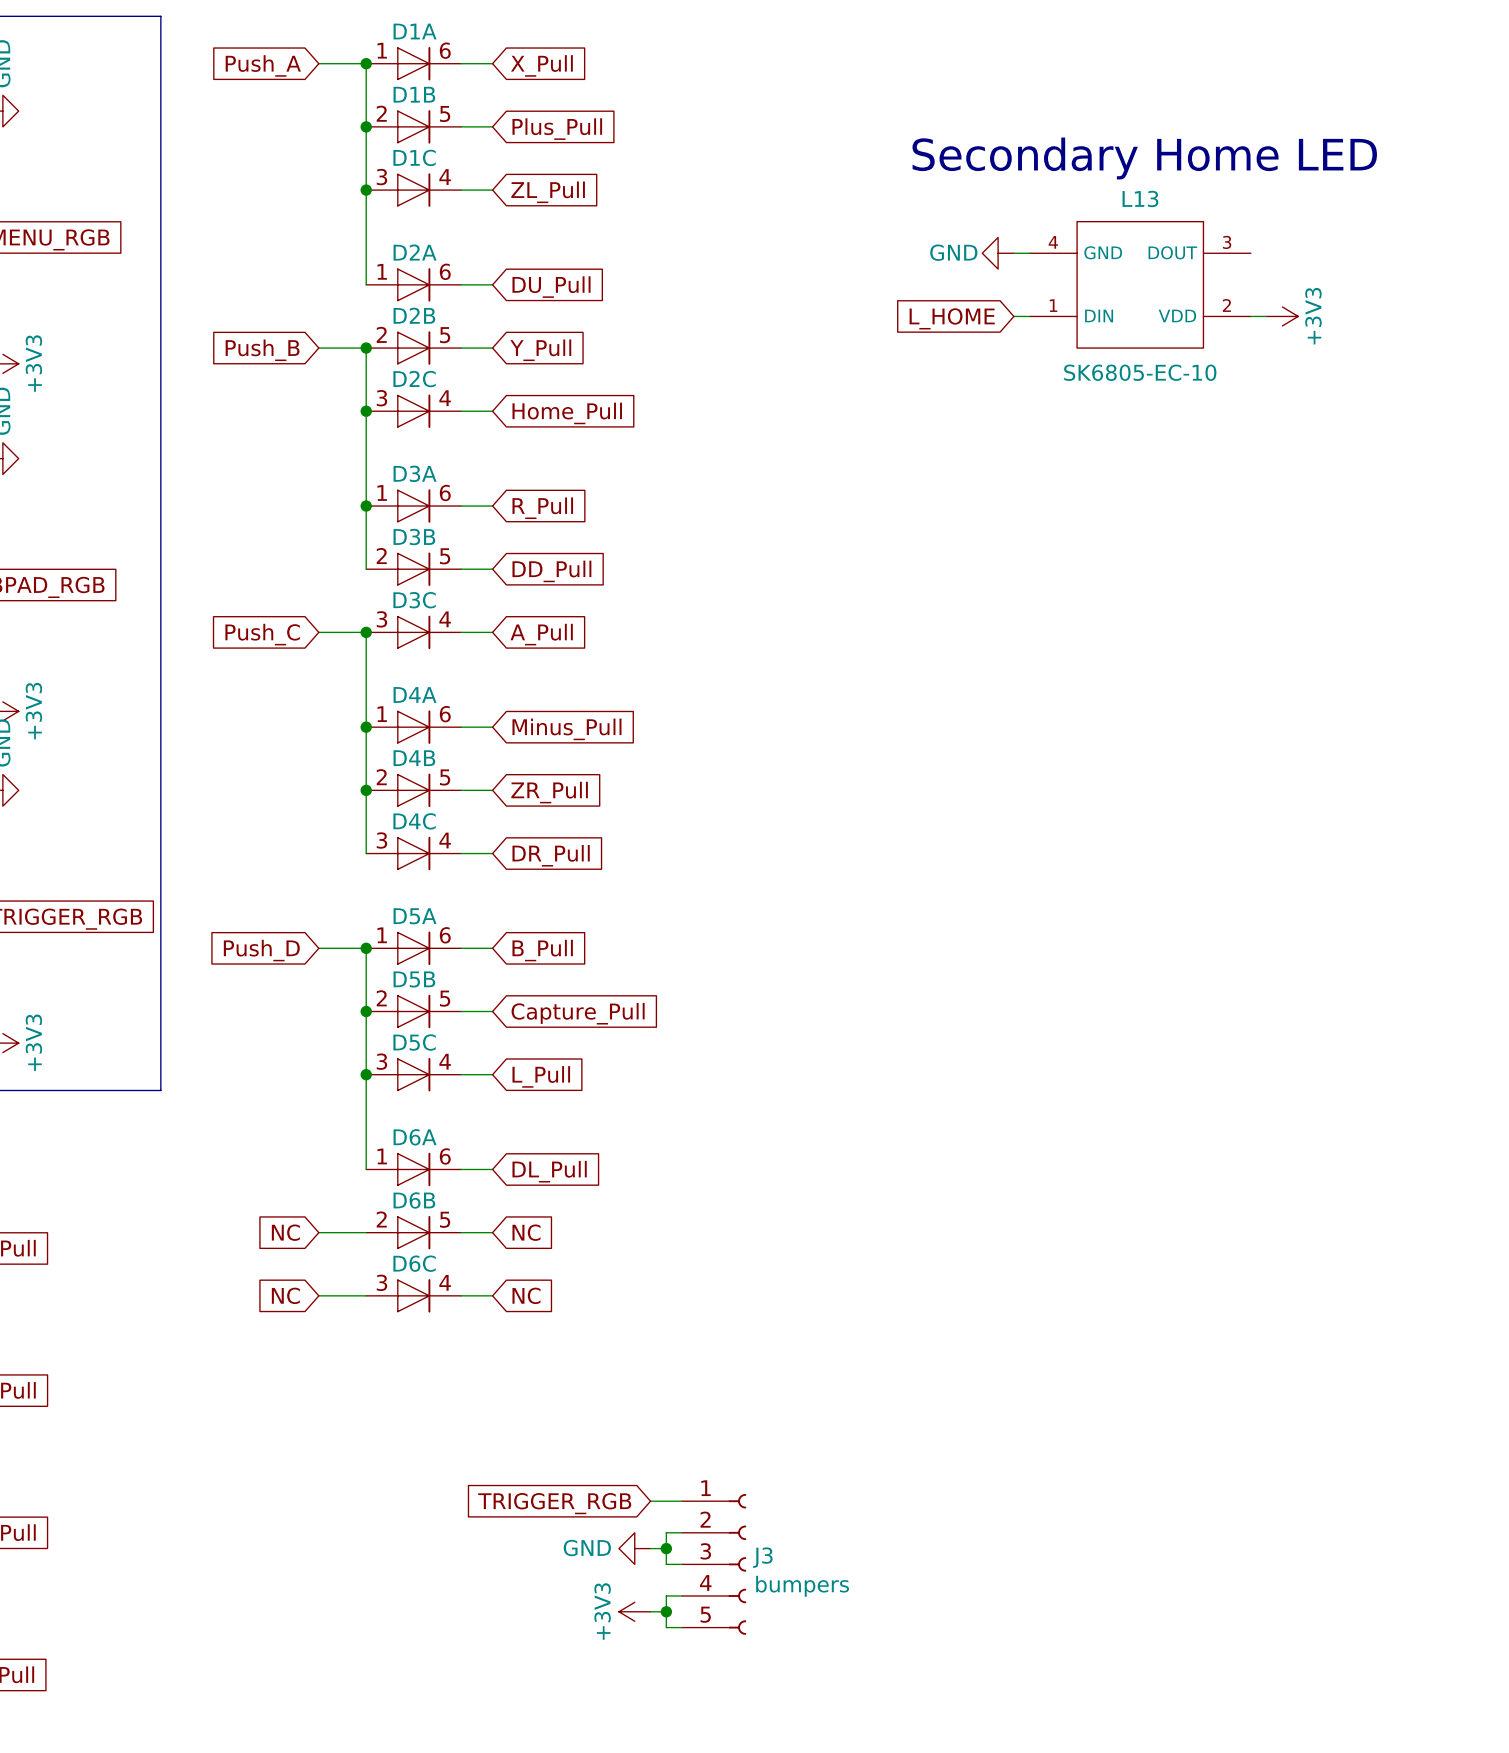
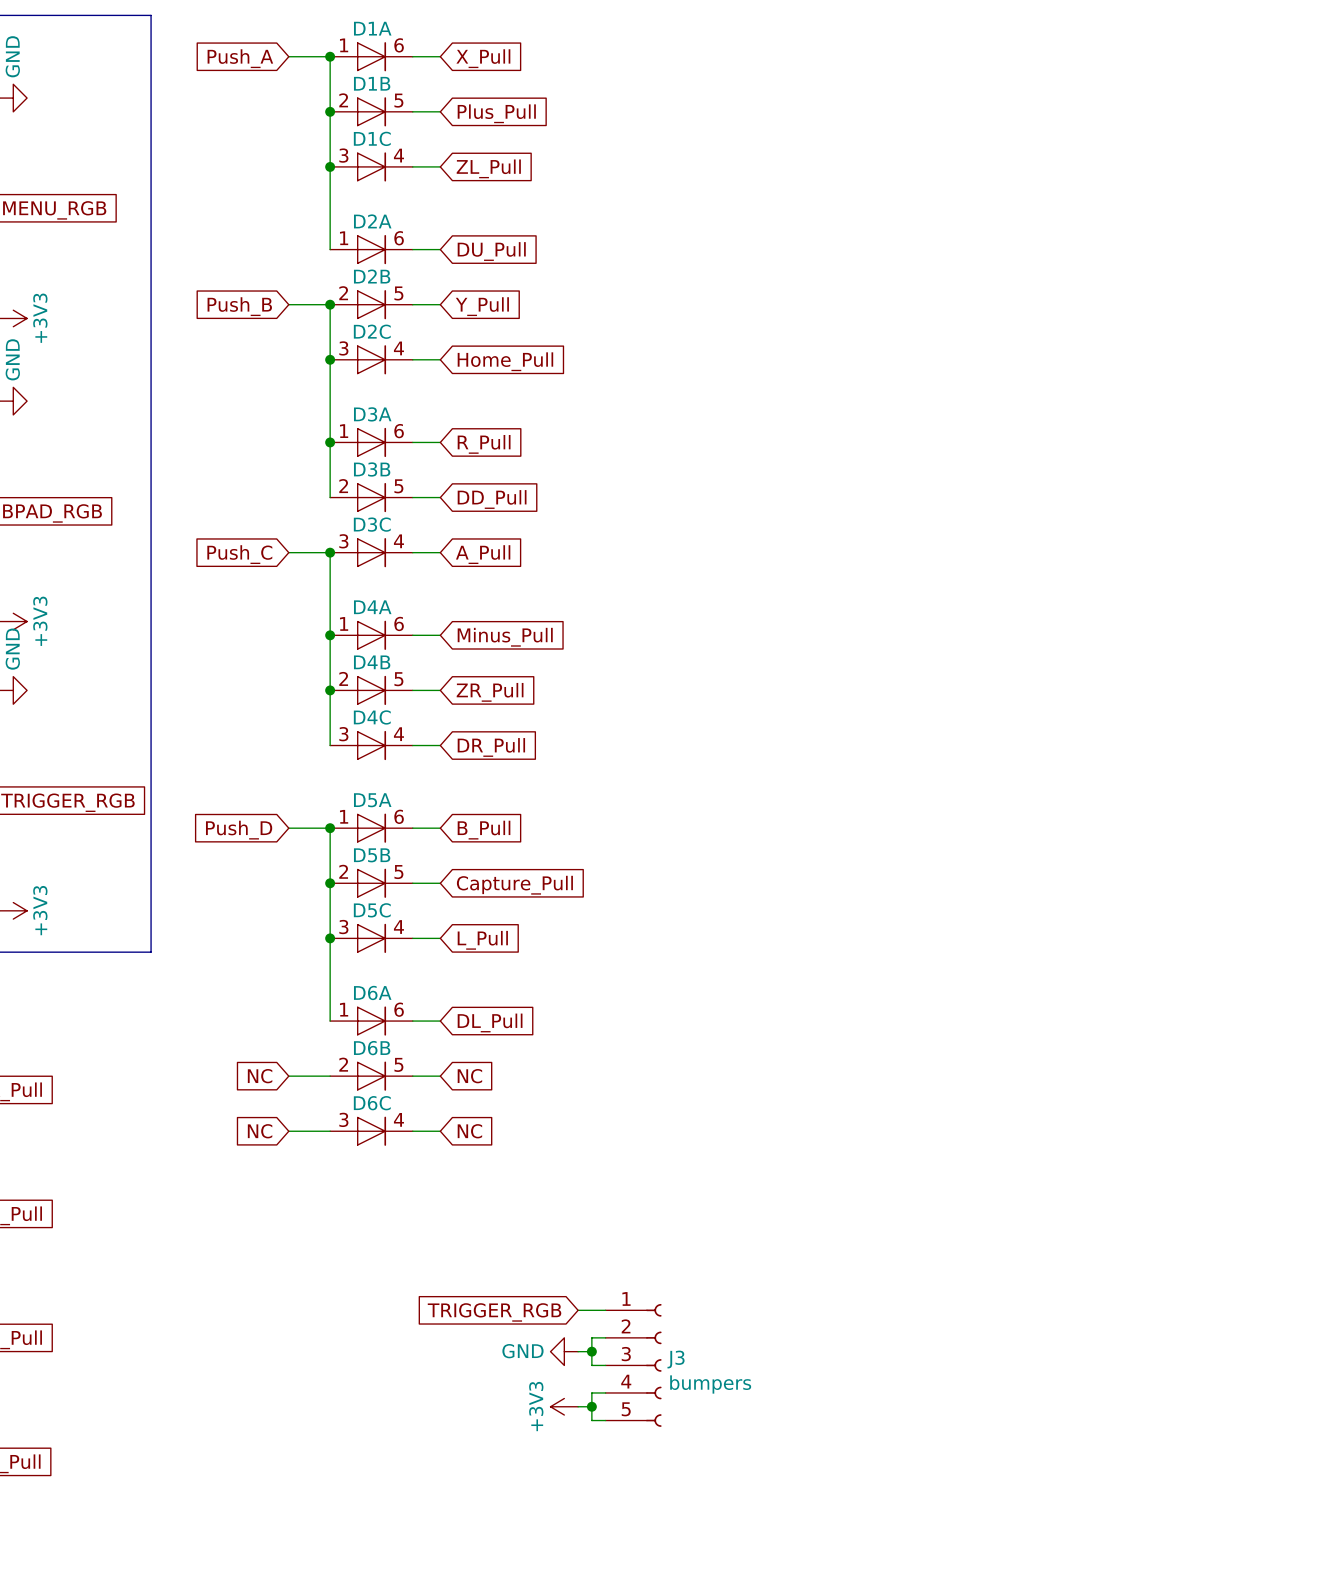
text: Secondary Home LED (1144, 158) -> none
power symbol: GND (998, 253) -> none
wire: (1013, 253) (1029, 253) -> none
L13: SK6805-EC-10 (1140, 284) -> none
wire: (1013, 316) (1029, 316) -> none
wire: (1250, 316) (1266, 316) -> none
power symbol: +3V3 (1282, 316) -> none
global label: L_HOME (952, 318) -> none

